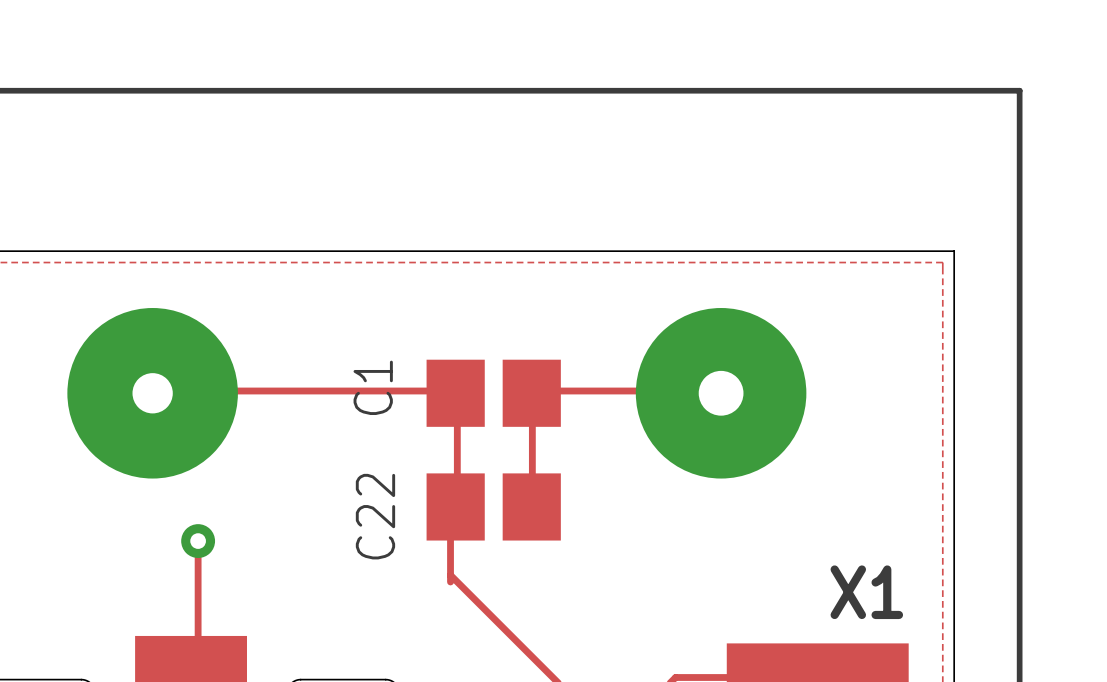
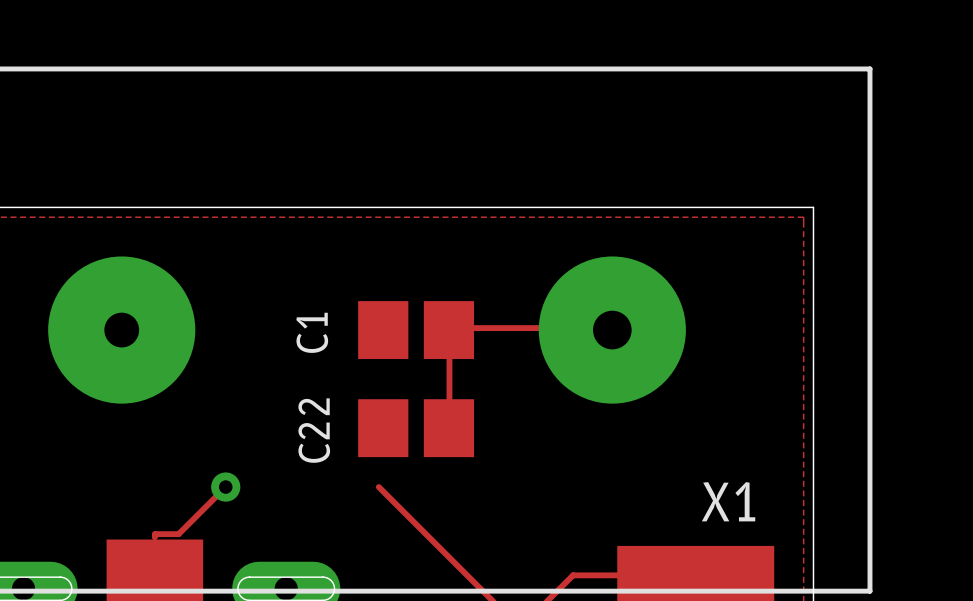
track: (152, 393) (157, 391) (450, 391) (455, 393) (457, 397) (457, 506) (450, 506) (450, 582) -> none
track: (198, 541) (198, 677) -> none
via position: (198, 541) -> (225, 487)
track: none -> (225, 487) (178, 534) (155, 534) (154, 537)

